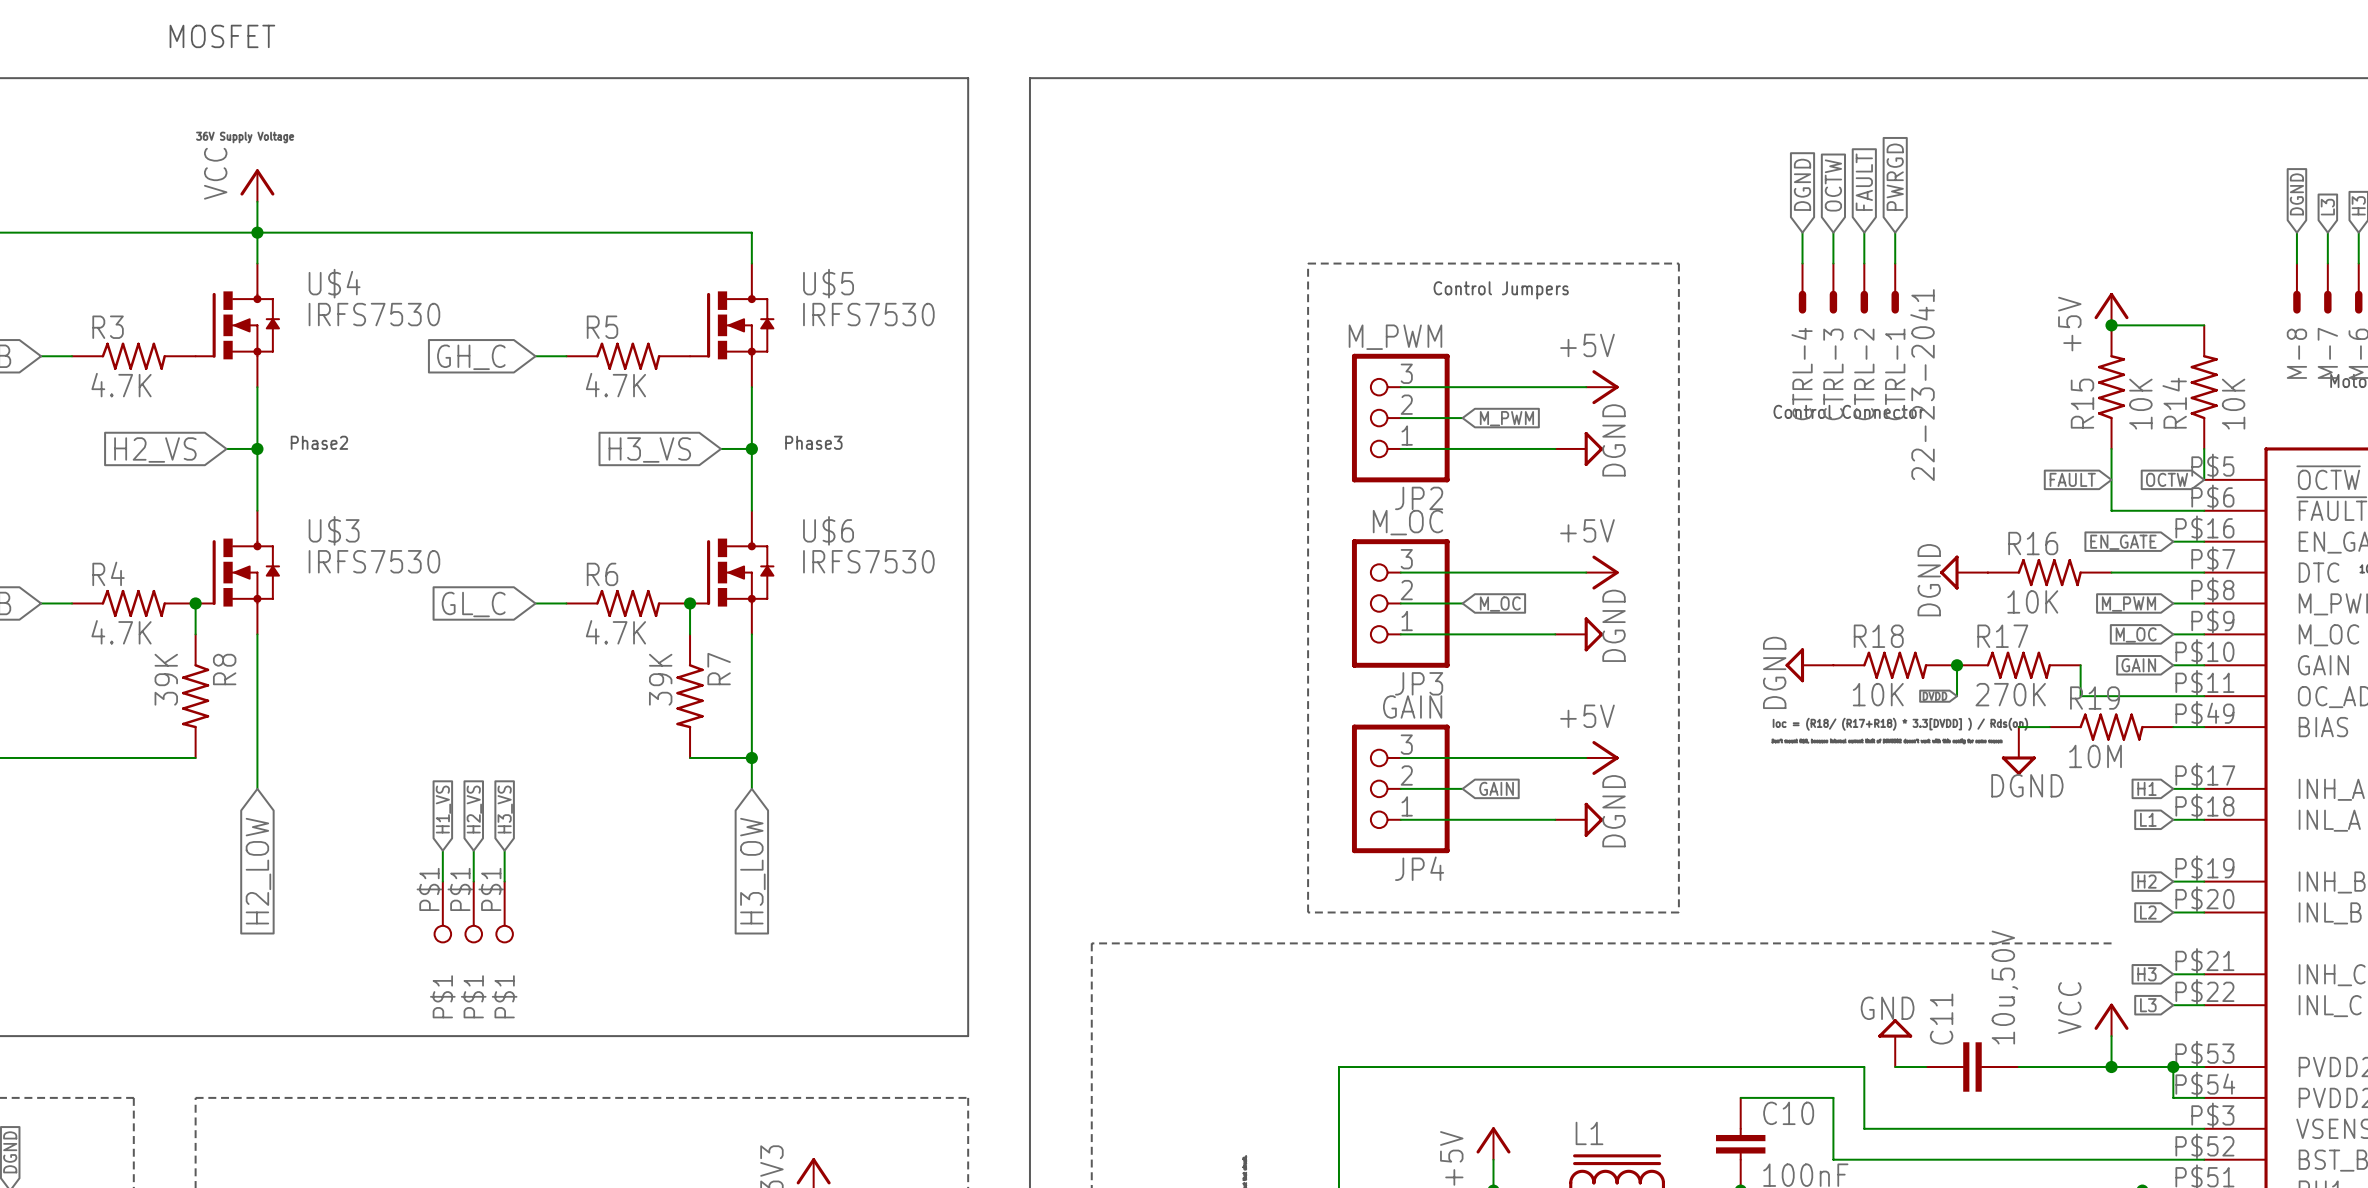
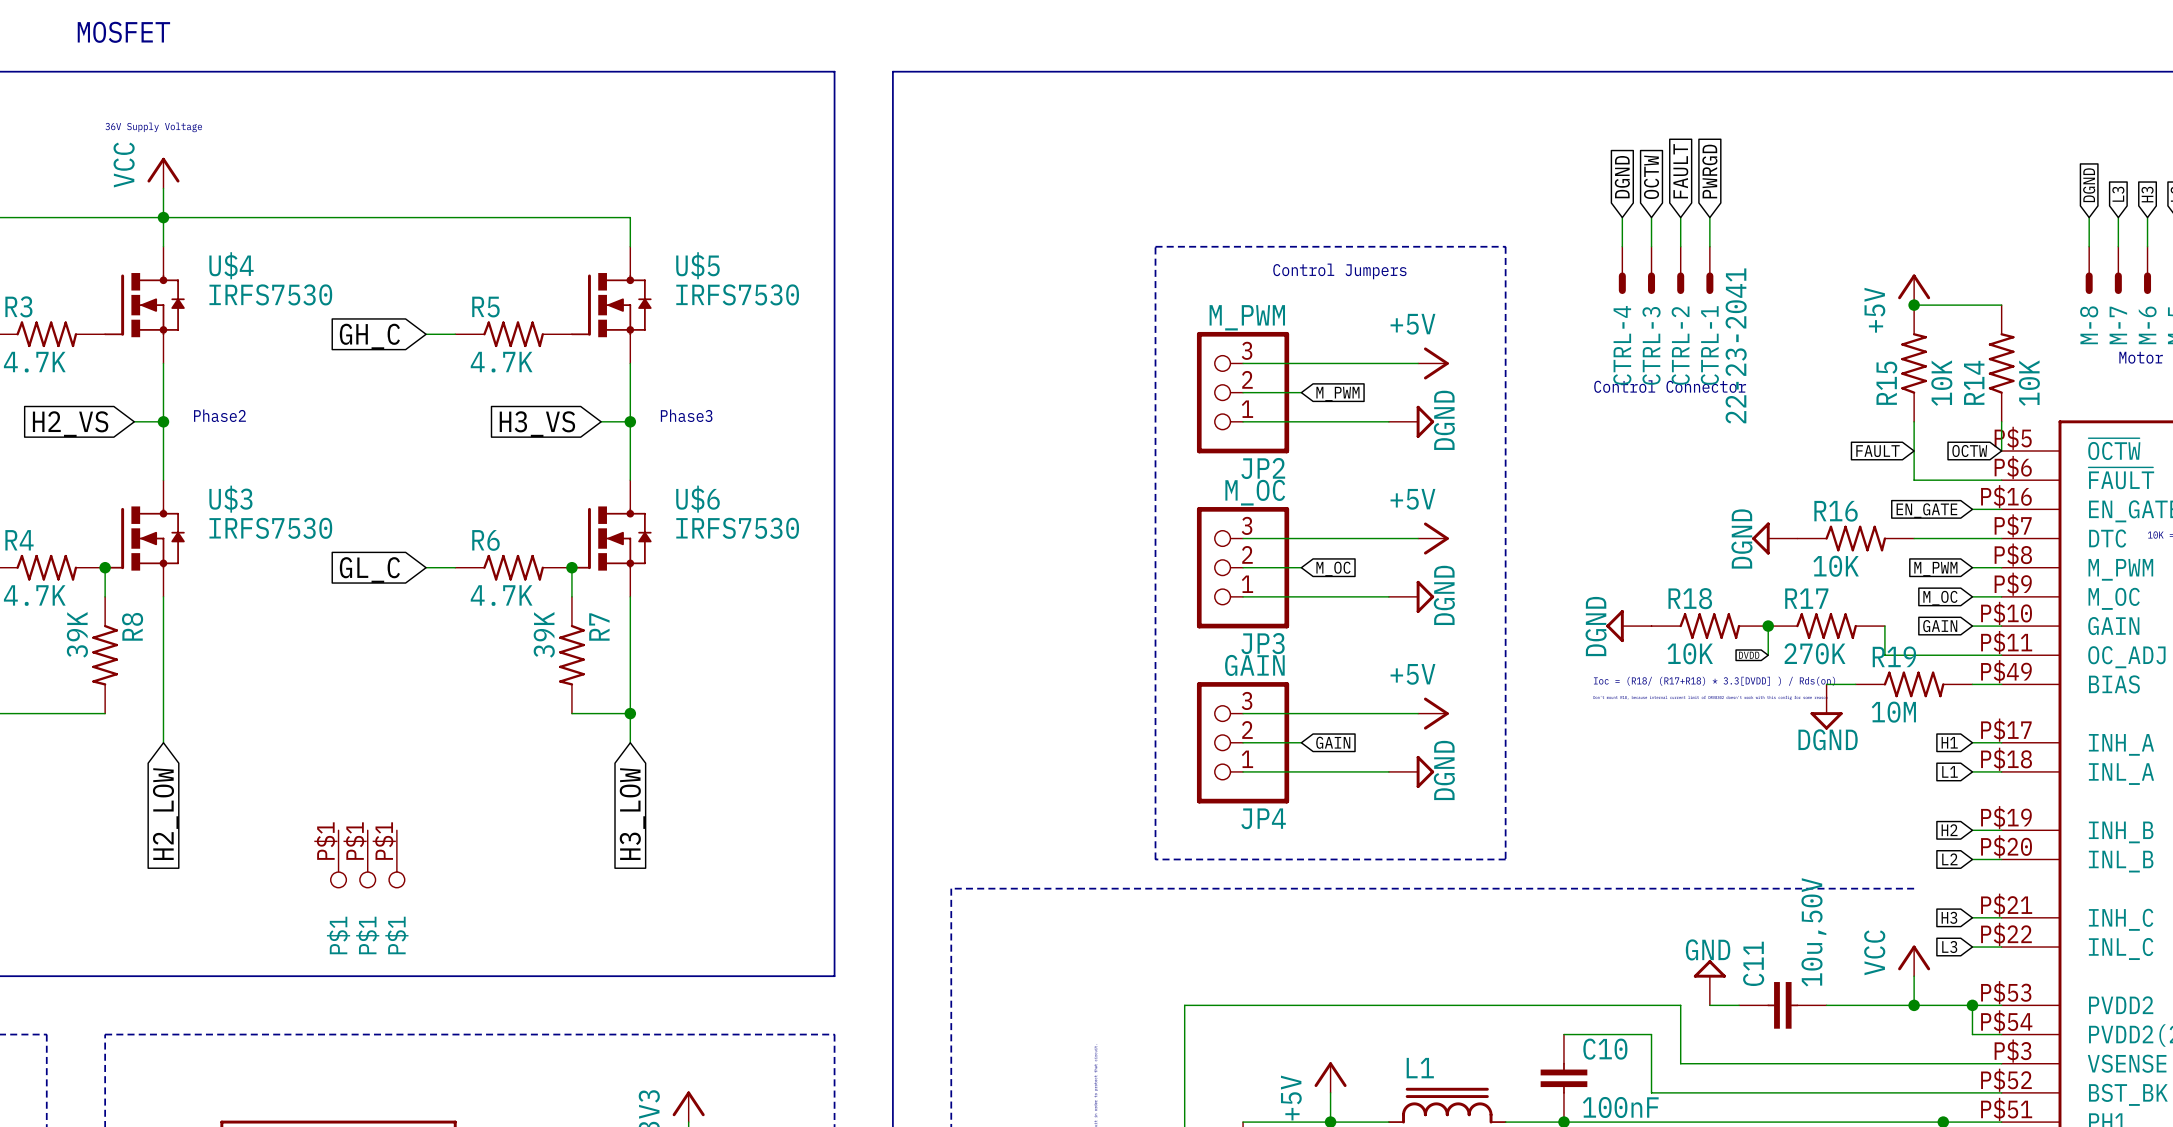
global label: H1_VS (443, 809) -> none
global label: H2_VS (474, 809) -> none
global label: H3_VS (505, 809) -> none
wire: (442, 850) (442, 881) -> none
wire: (473, 850) (473, 881) -> none
wire: (504, 850) (504, 881) -> none

